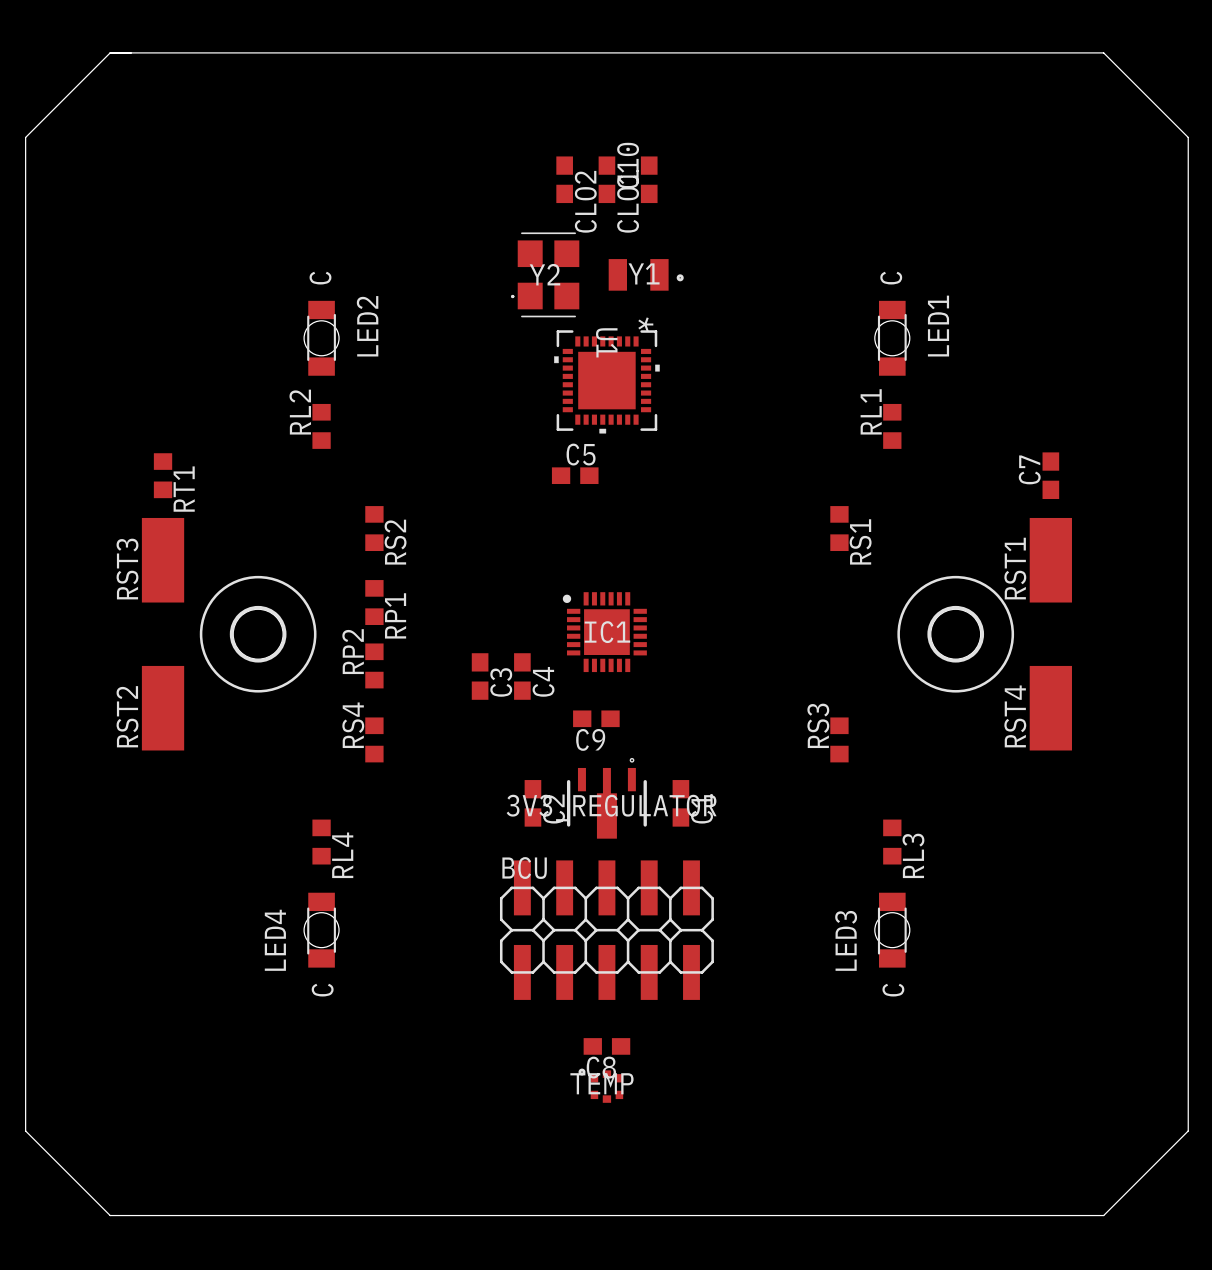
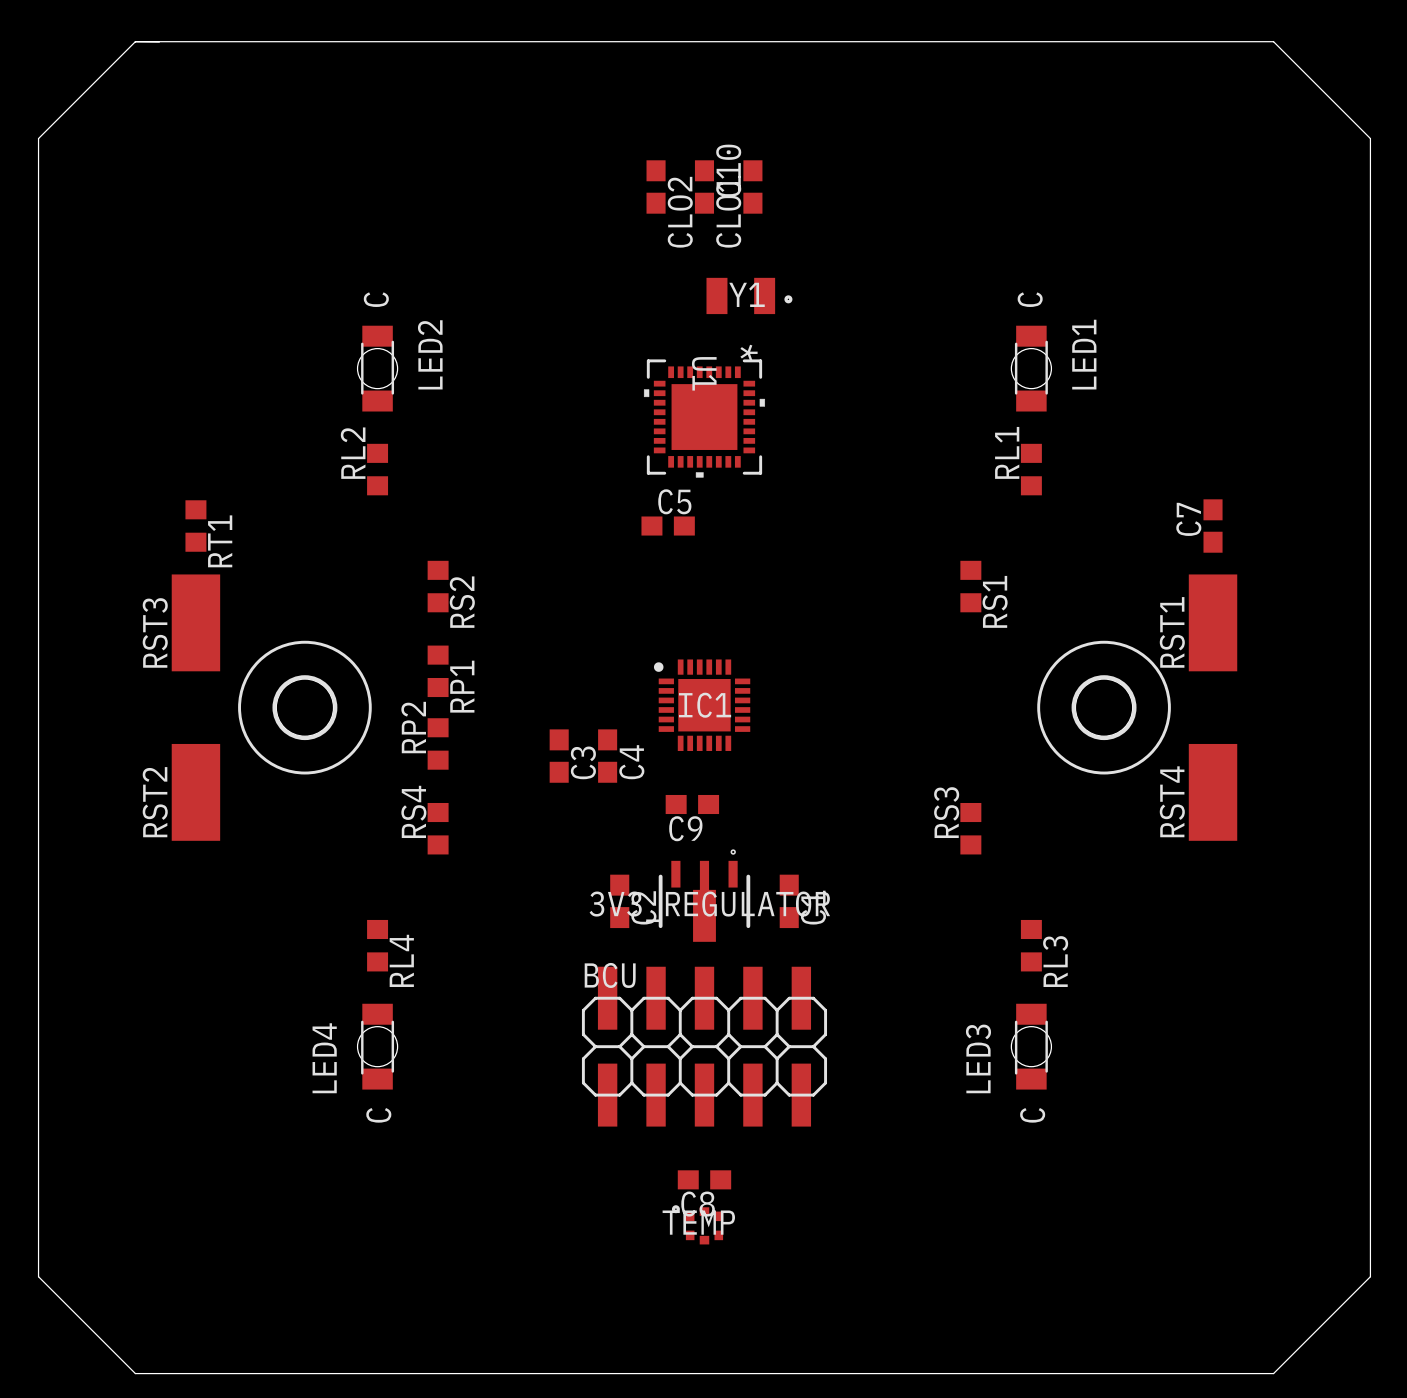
Y2: (545, 274) -> none

